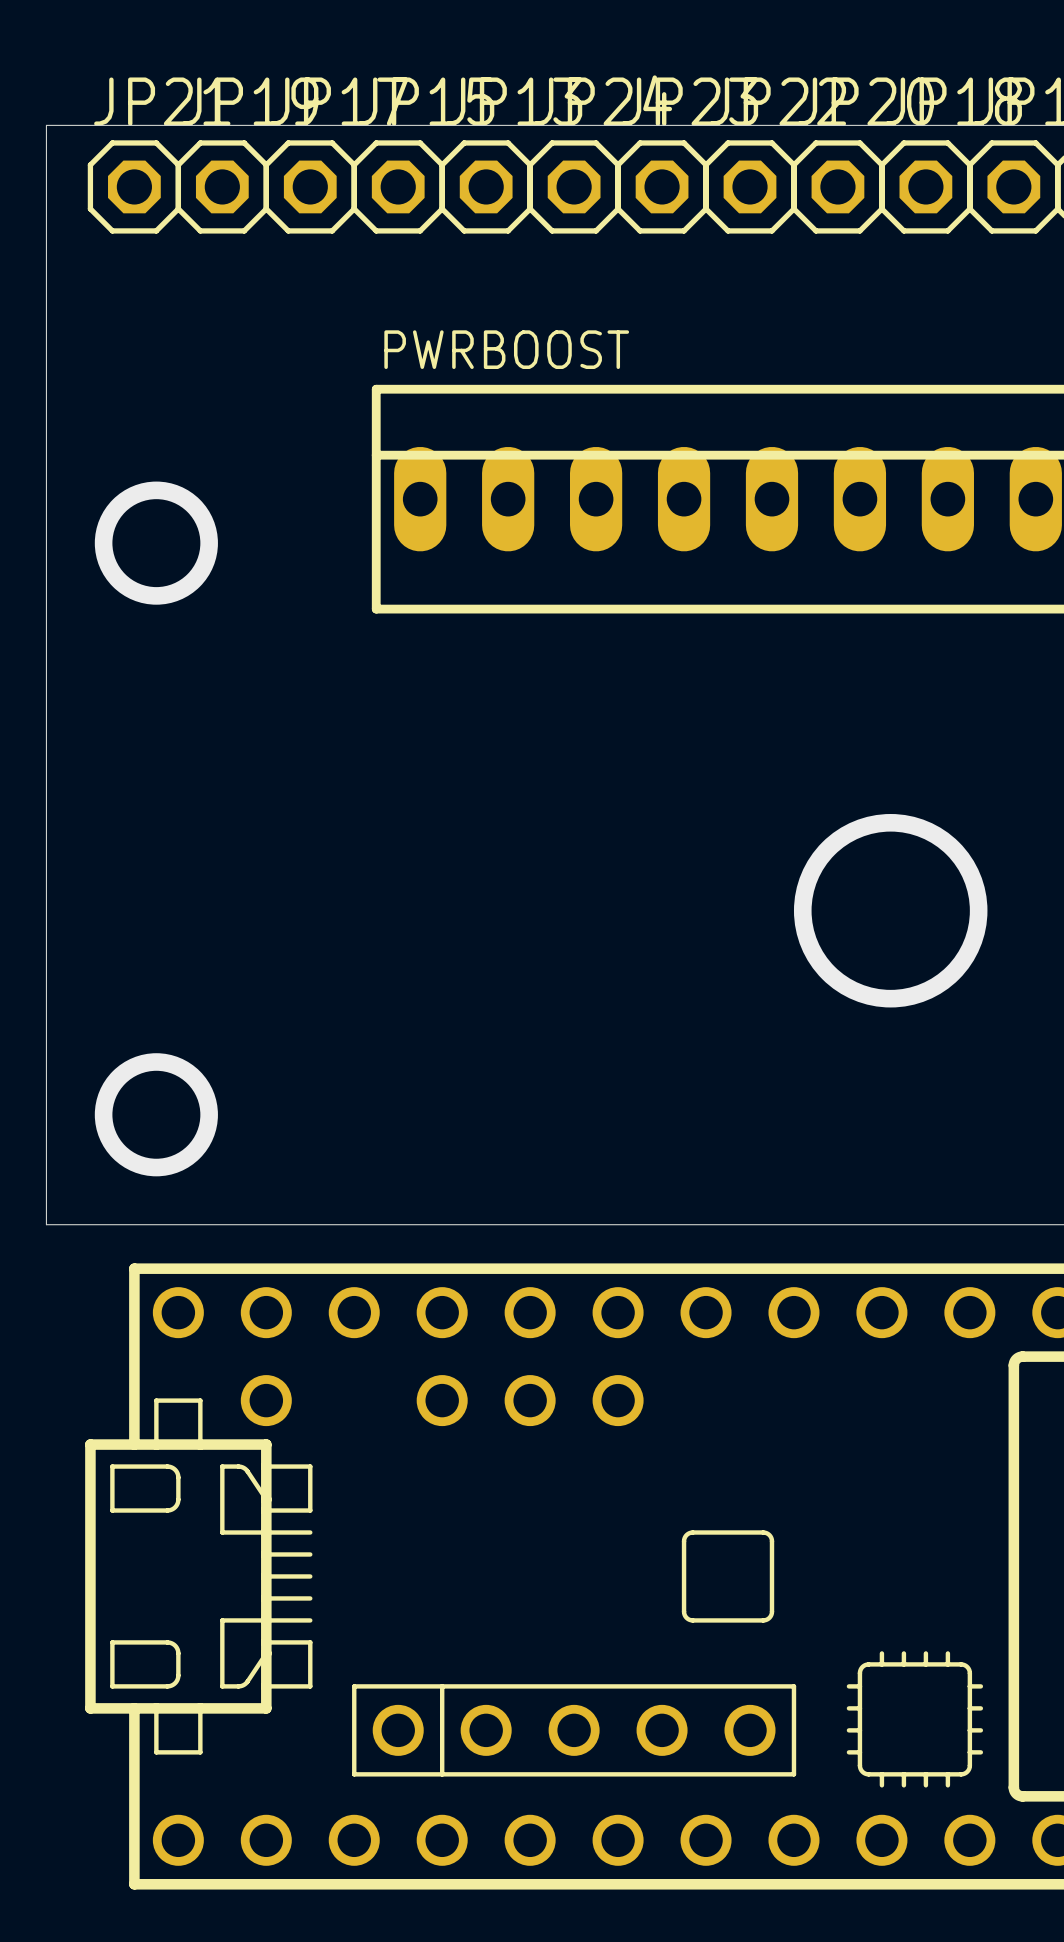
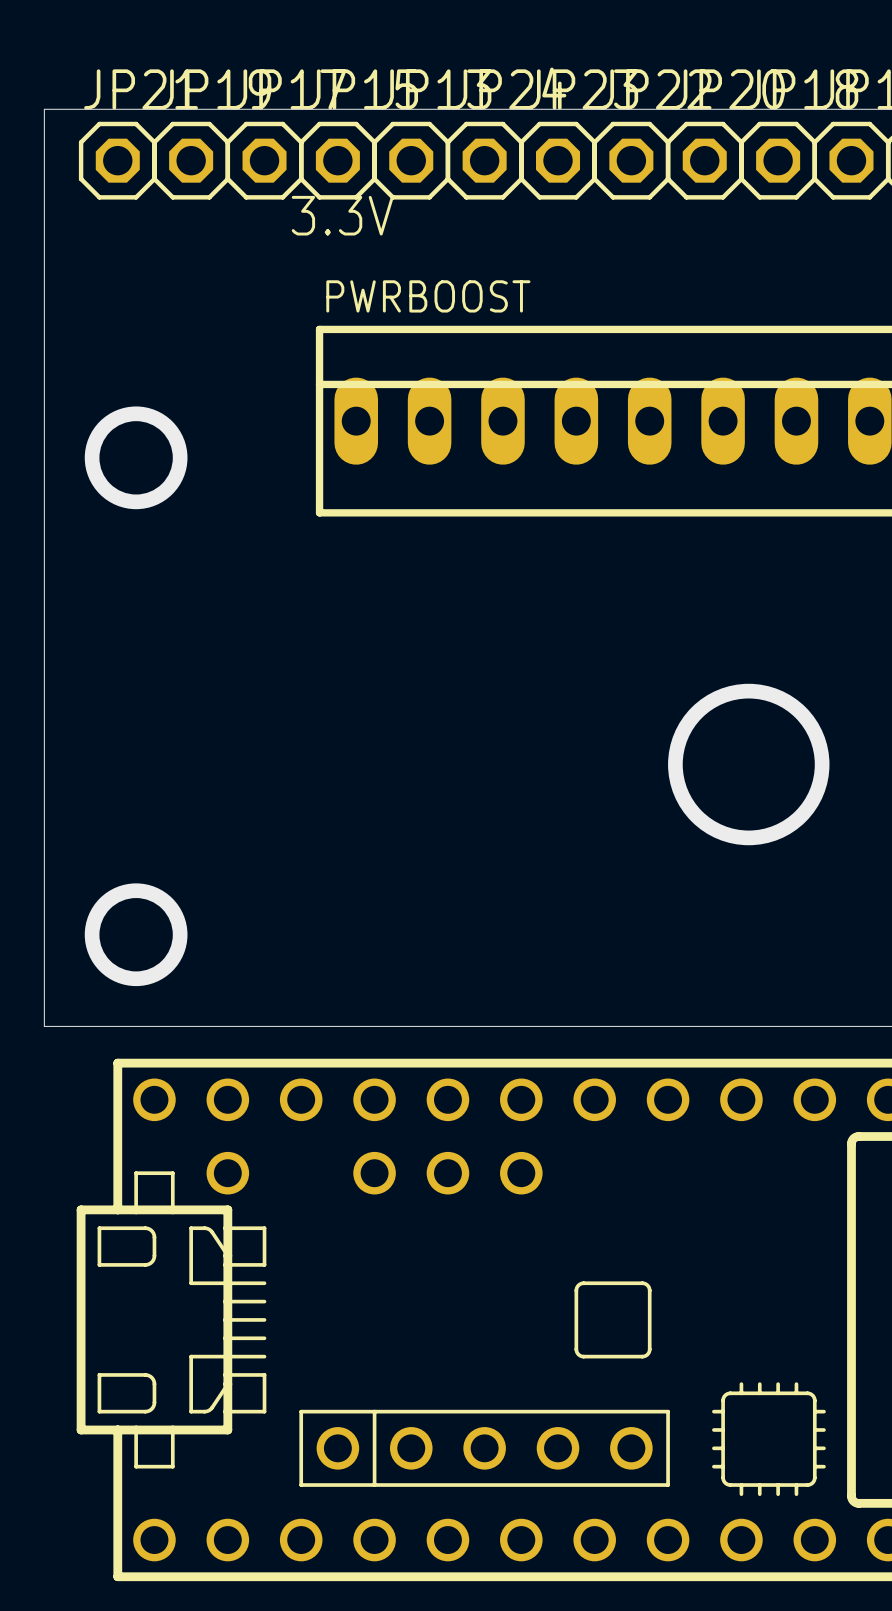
text: none -> 3.3V (342, 215)

